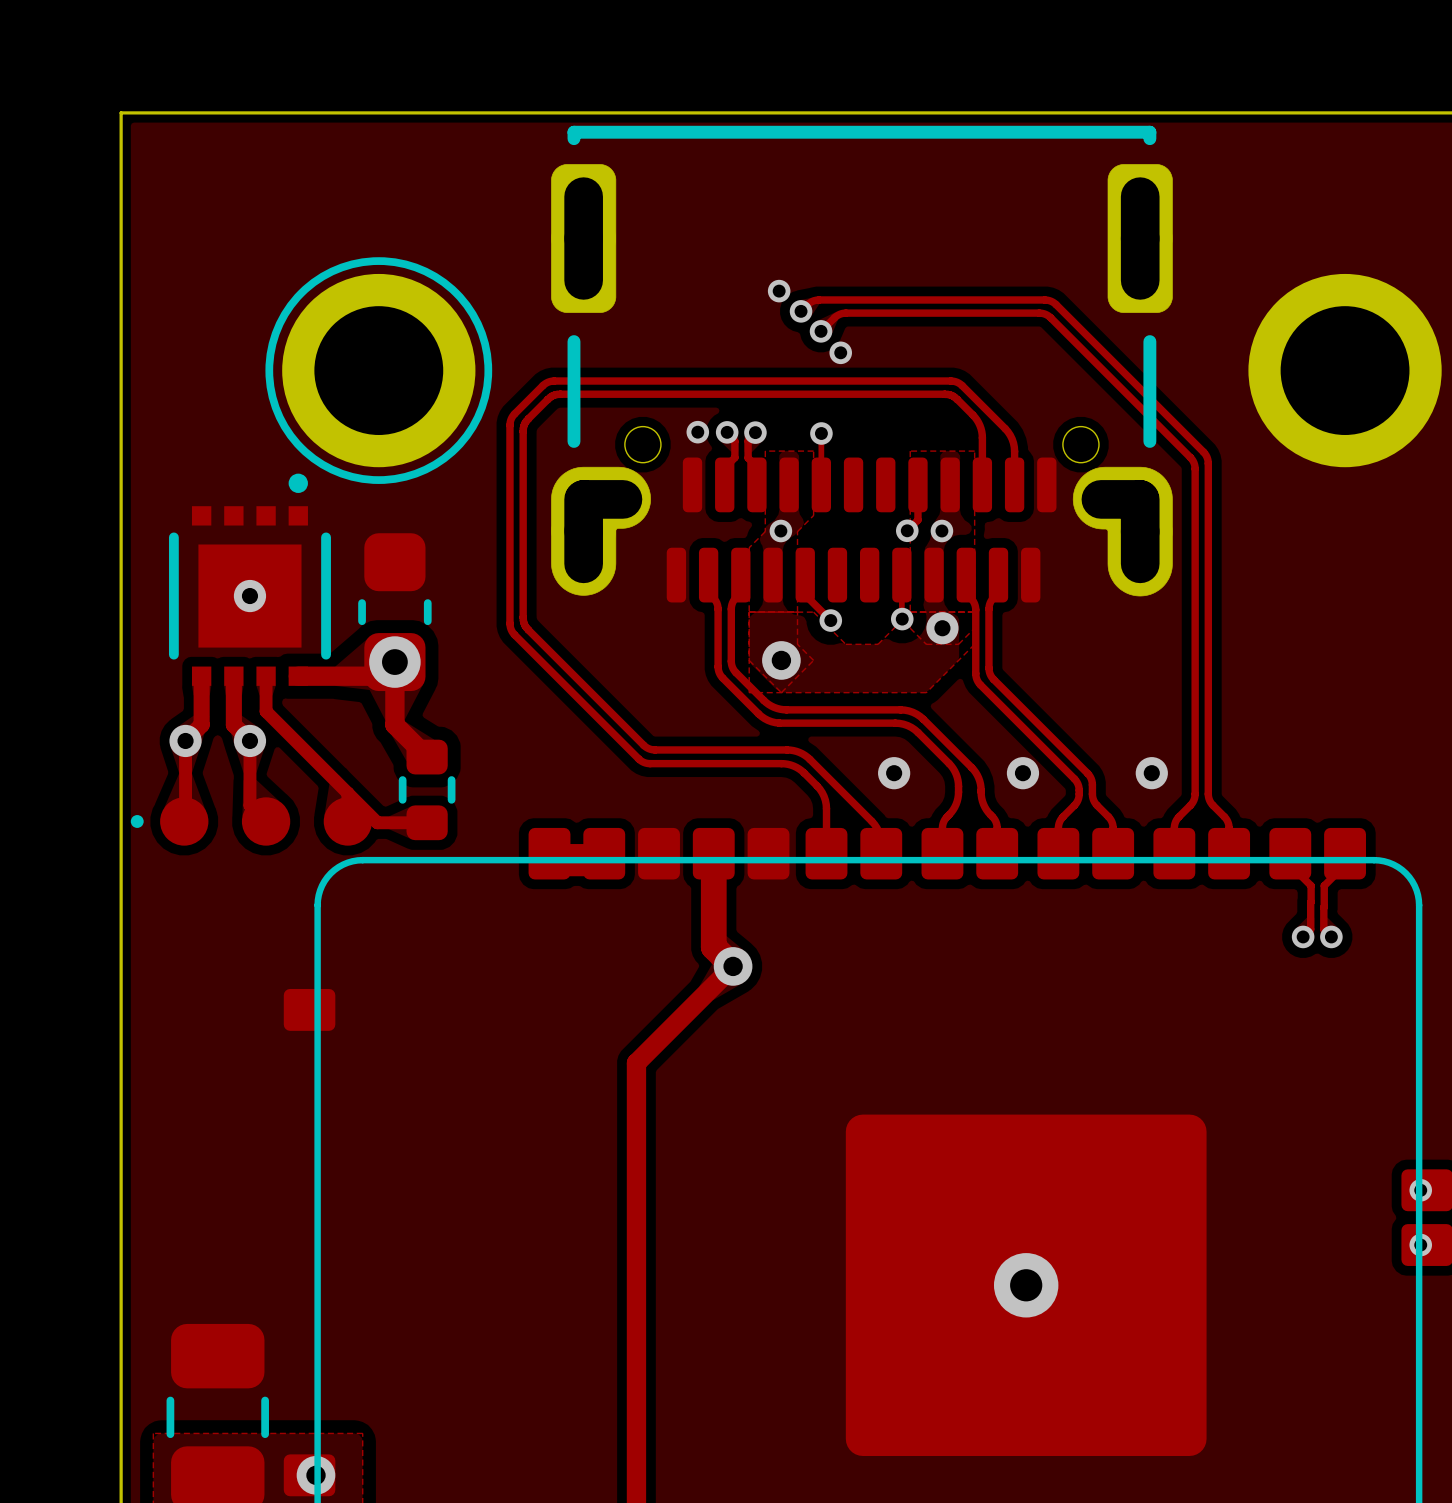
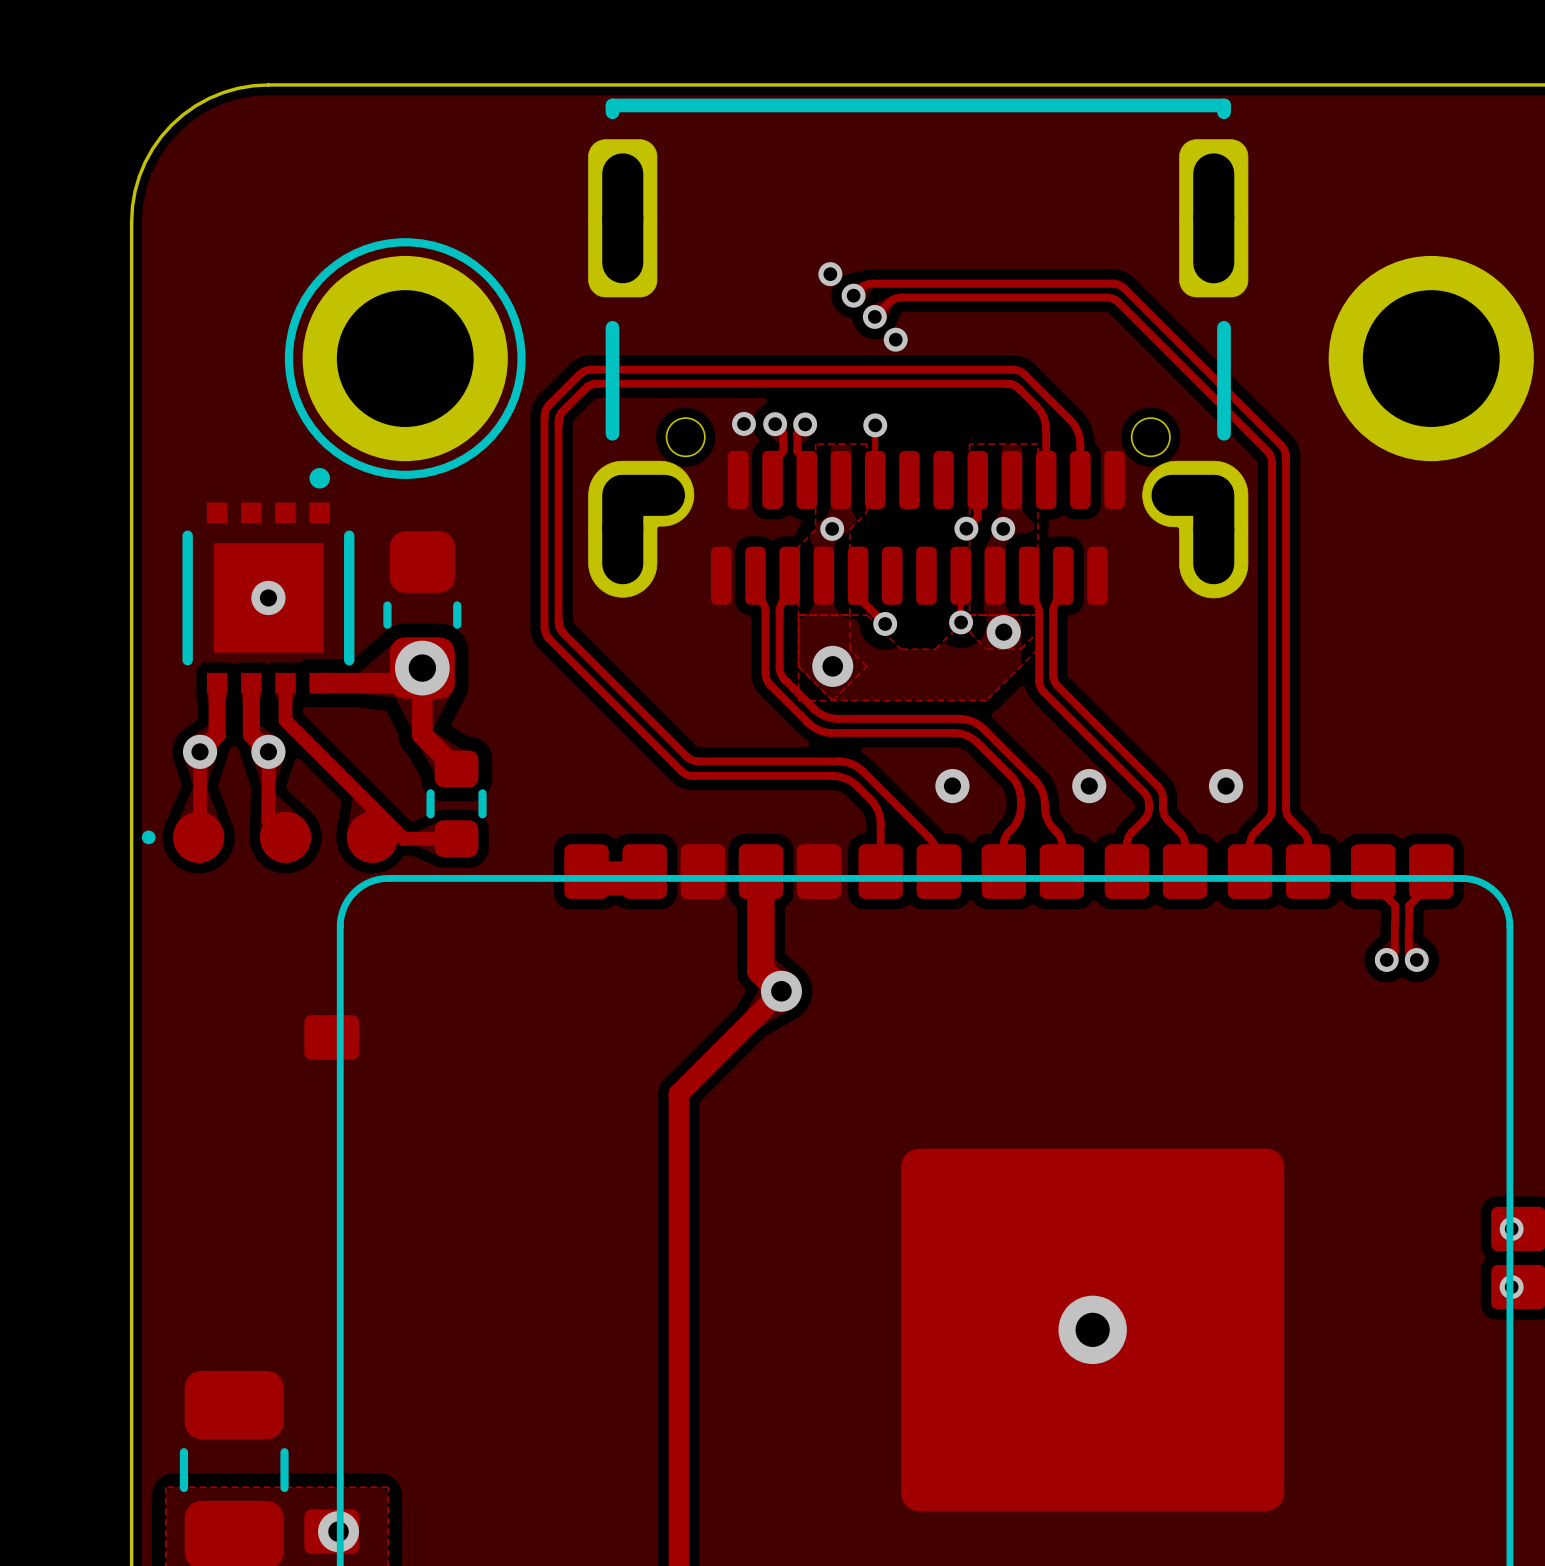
board edge: (249, 112) (121, 112) (121, 241) -> (268, 84) (237, 88) (209, 98) (195, 105) (171, 125) (152, 148) (145, 162) (135, 191) (131, 221)

